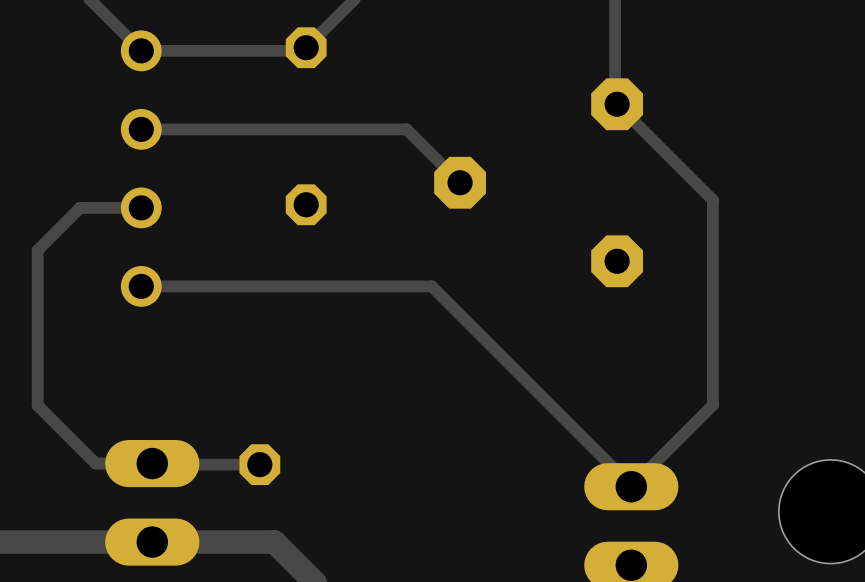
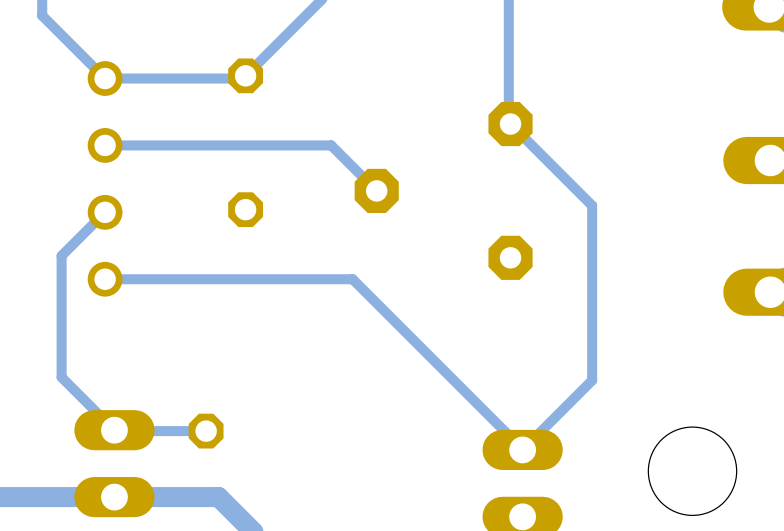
track: (141, 207) (80, 207) (37, 250) (37, 405) (95, 463) (152, 463) -> (105, 212) (61, 255) (61, 377) (114, 430)

